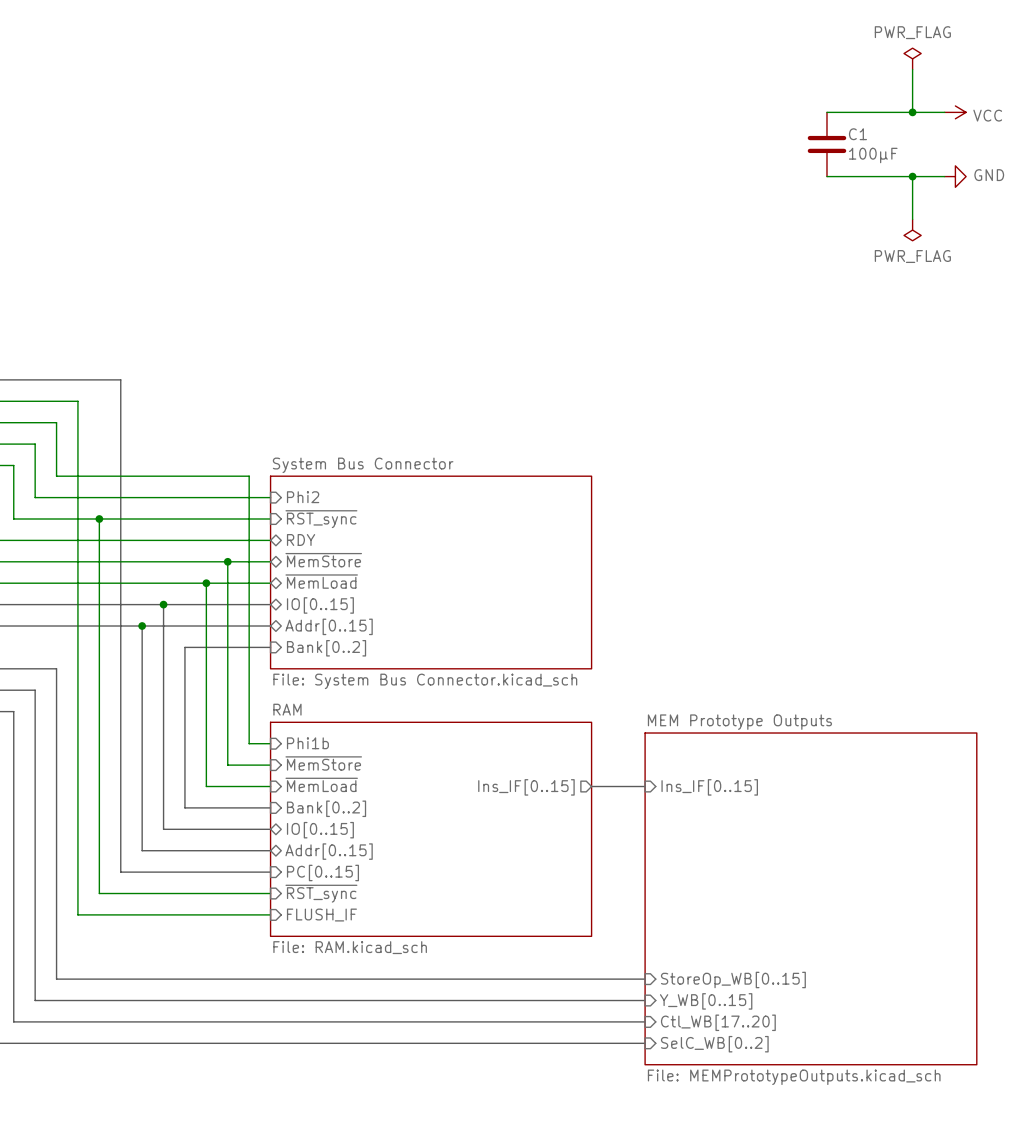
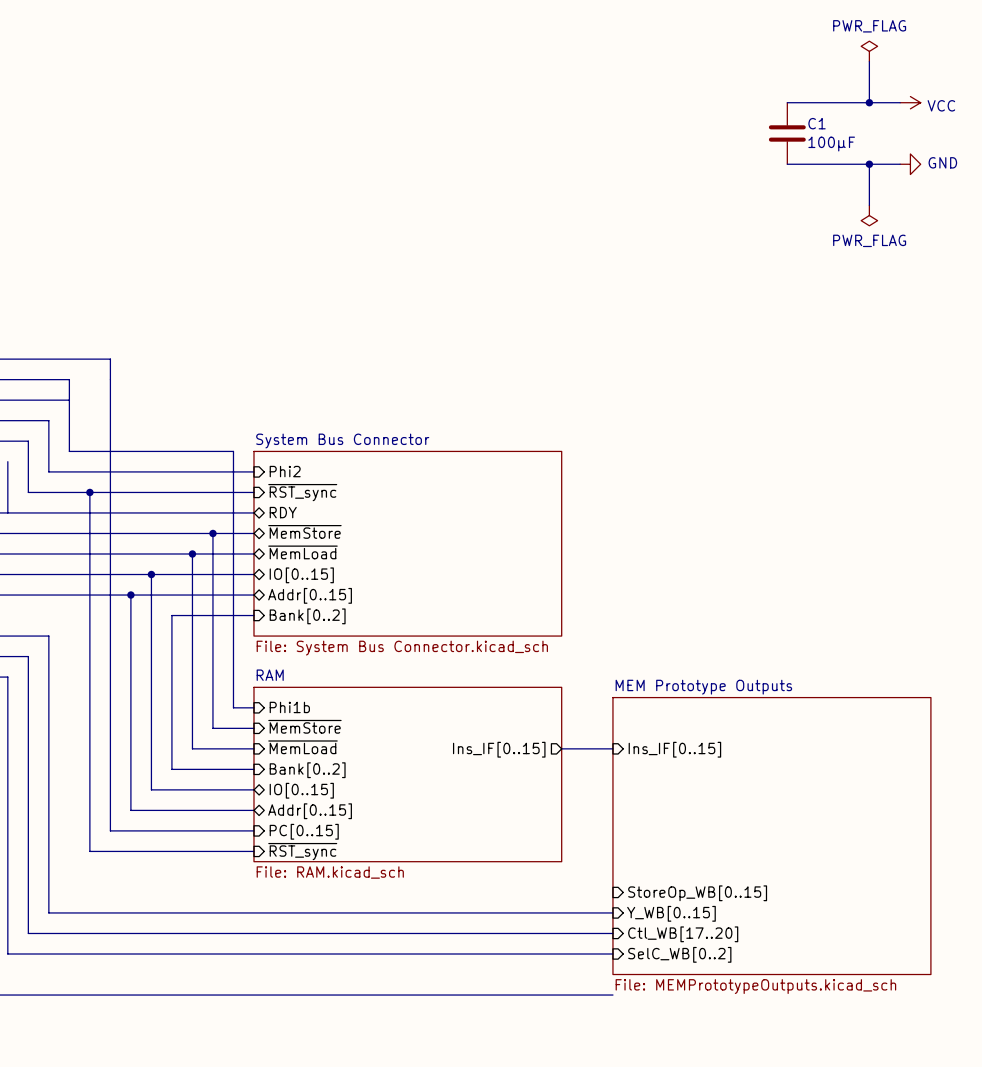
wire: (56, 422) (56, 444) -> (48, 400) (69, 400)
wire: (35, 444) (35, 465) -> (28, 420) (48, 420)
wire: (13, 465) (13, 486) -> (7, 441) (28, 441)
wire: (56, 476) (77, 476) (77, 914) (270, 914) -> (48, 451) (48, 471)
wire: (35, 497) (56, 497) -> (28, 471) (28, 492)
wire: (13, 518) (35, 518) -> (7, 492) (7, 512)
sheet RAM: none -> File: RAM.kicad_sch (407, 774)
sheet RAM: File: RAM.kicad_sch (431, 829) -> none
sheet MEM Prototype Outputs: none -> File: MEMPrototypeOutputs.kicad_sch (771, 836)
sheet MEM Prototype Outputs: File: MEMPrototypeOutputs.kicad_sch (810, 898) -> none
sheet pin: FLUSH_IF (321, 915) -> none
sheet pin: none -> StoreOp_WB[0..15] (697, 893)
bus: (56, 957) (56, 979) -> (28, 933) (48, 933)
bus: none -> (48, 912) (612, 912)
sheet pin: none -> Y_WB[0..15] (671, 913)
bus: (35, 979) (35, 1000) -> (7, 953) (28, 953)
sheet pin: StoreOp_WB[0..15] (733, 979) -> Ctl_WB[17..20] (683, 934)
bus: (13, 1000) (13, 1021) (645, 1021) -> none
sheet pin: Y_WB[0..15] (706, 1001) -> SelC_WB[0..2] (679, 954)
sheet pin: Ctl_WB[17..20] (718, 1022) -> none
sheet pin: SelC_WB[0..2] (714, 1044) -> none

